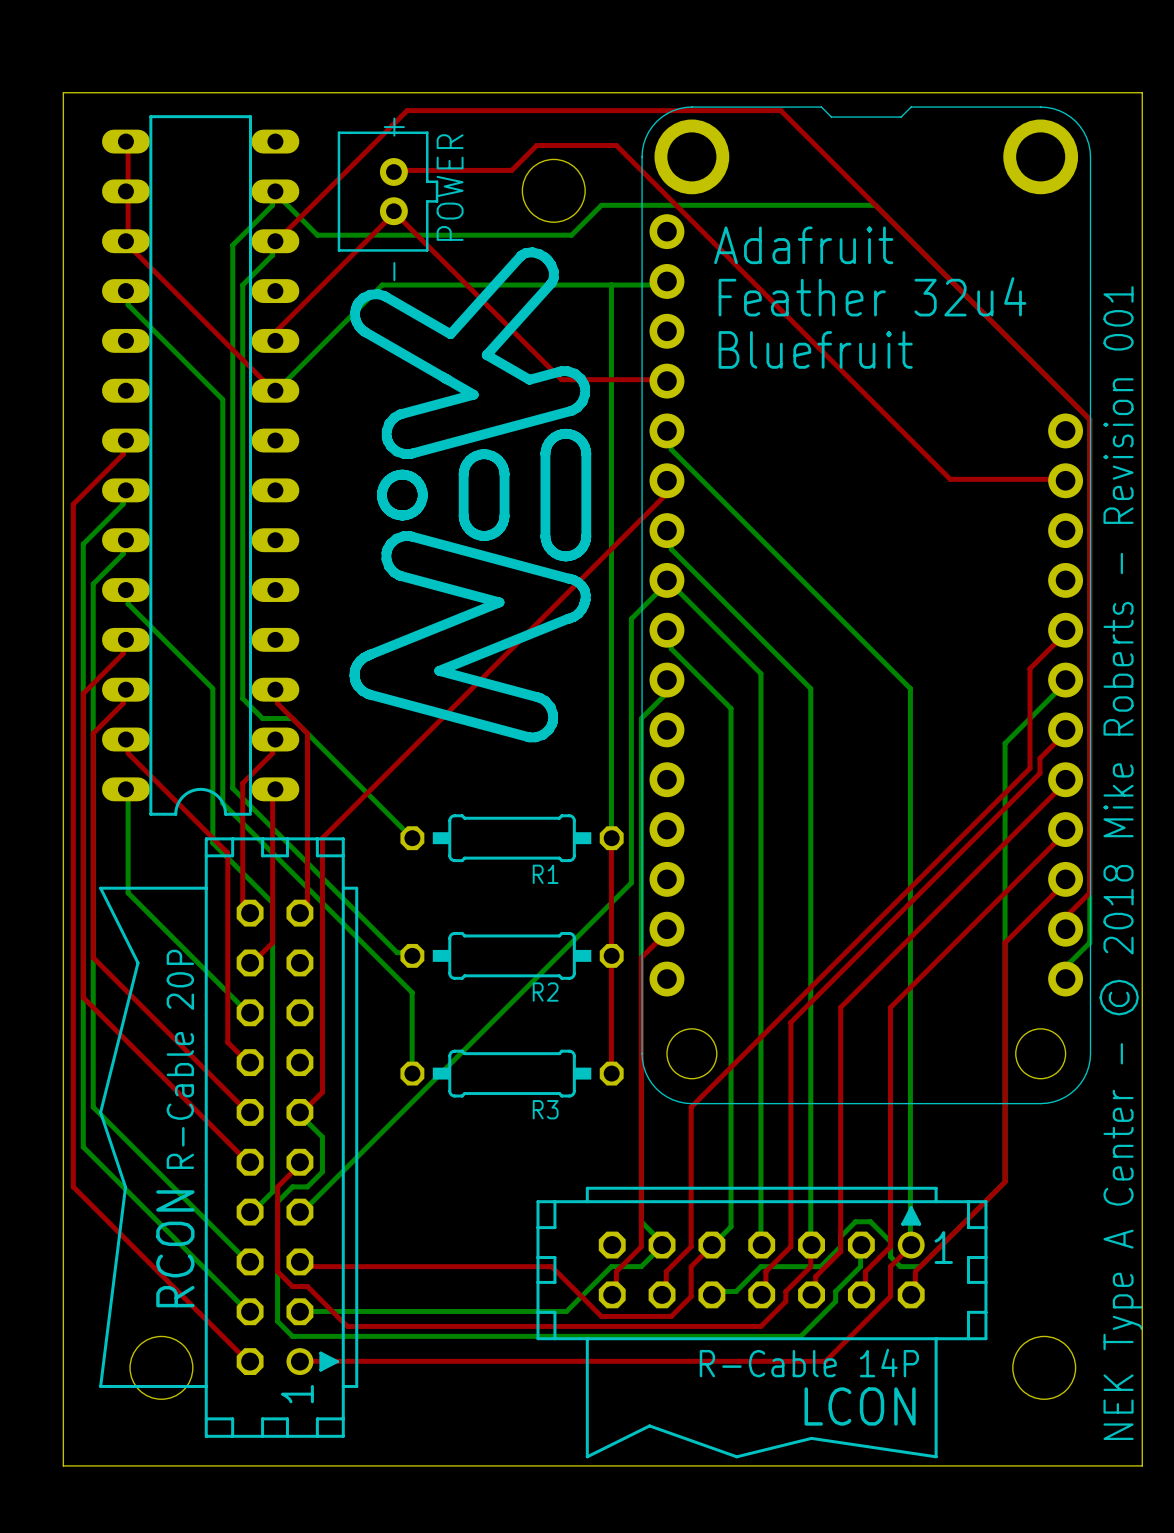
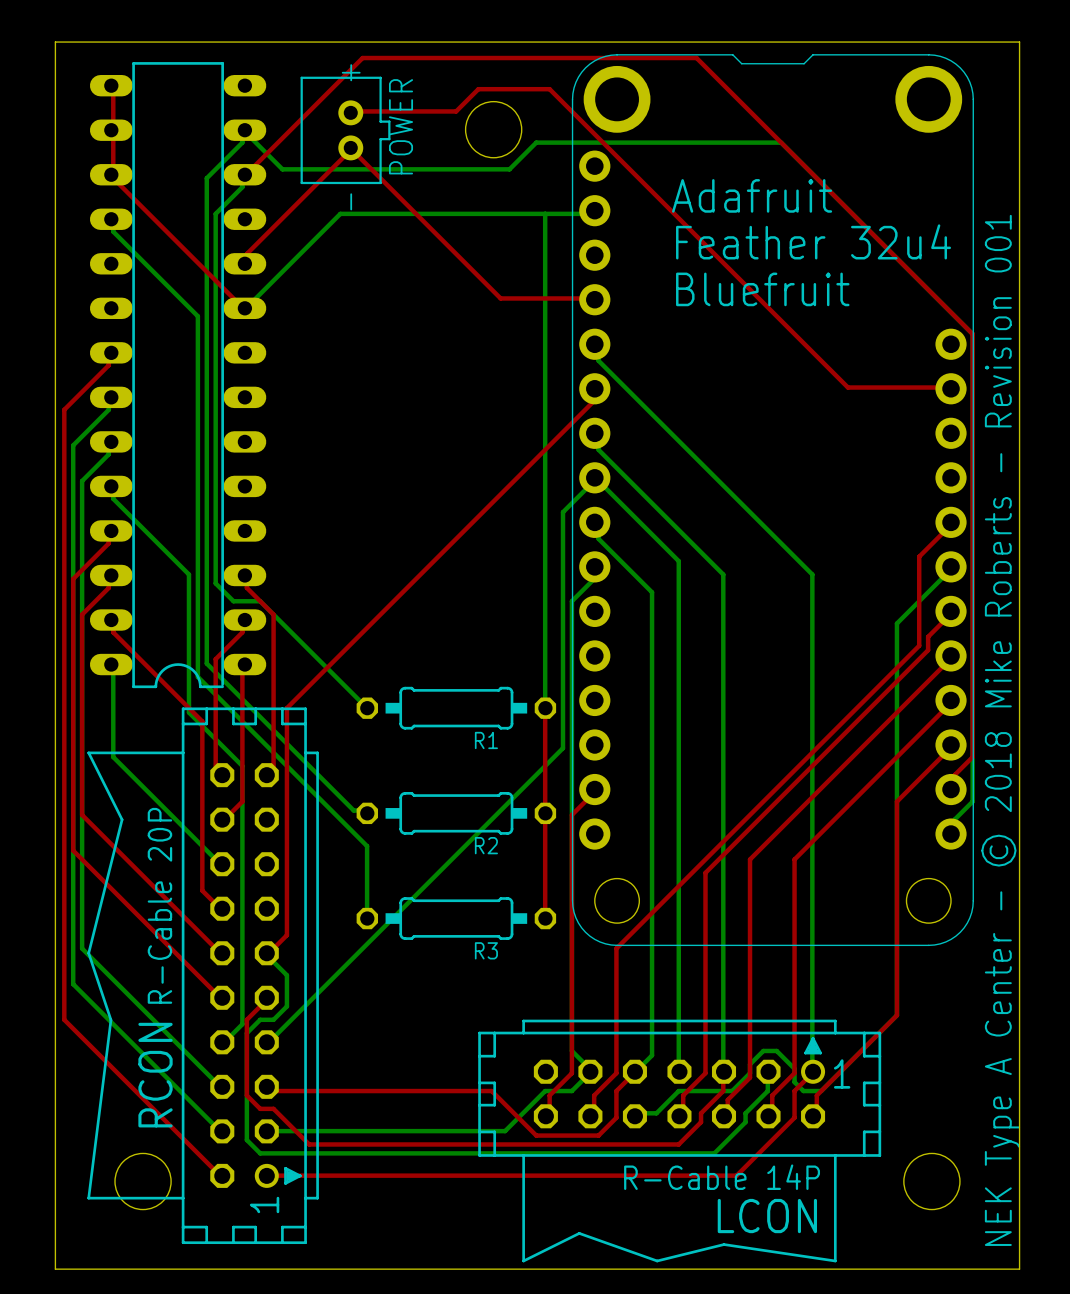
text position: Adafruit (803, 245) -> Adafruit (752, 195)
text position: Feather 32u4 (872, 296) -> Feather 32u4 (813, 241)
line: (355, 313) (357, 304) (363, 298) (370, 294) (378, 294) (450, 334) (521, 255) (532, 252) (544, 257) (553, 271) (551, 282) (486, 355) (529, 379) (561, 371) (575, 373) (581, 378) (584, 386) (585, 394) (582, 401) (572, 410) (410, 454) (396, 451) (390, 446) (386, 437) (389, 423) (394, 417) (473, 394) (447, 379) -> none
line: (355, 317) (358, 326) (364, 331) (447, 379) -> none
text position: Bluefruit (815, 349) -> Bluefruit (762, 289)
line: (564, 433) (551, 439) (545, 450) (545, 536) (551, 550) (557, 554) (566, 556) (580, 550) (585, 540) (586, 453) (580, 439) (573, 435) (564, 433) -> none
line: (483, 454) (472, 457) (465, 466) (463, 516) (469, 529) (476, 534) (485, 535) (495, 532) (502, 523) (504, 473) (498, 460) (492, 455) (483, 454) -> none
line: (401, 474) (387, 480) (383, 487) (381, 496) (387, 509) (394, 513) (403, 515) (416, 509) (421, 503) (422, 494) (416, 480) (410, 476) (401, 474) -> none
line: (585, 600) (584, 588) (573, 579) (410, 536) (403, 536) (396, 538) (387, 549) (386, 559) (394, 572) (399, 575) (499, 602) (371, 654) -> none
line: (584, 603) (582, 609) (573, 617) (439, 670) (540, 697) (545, 701) (550, 706) (553, 720) (549, 729) (543, 734) (529, 737) (369, 694) (362, 691) (357, 684) -> none
line: (368, 655) (357, 664) (355, 679) -> none

